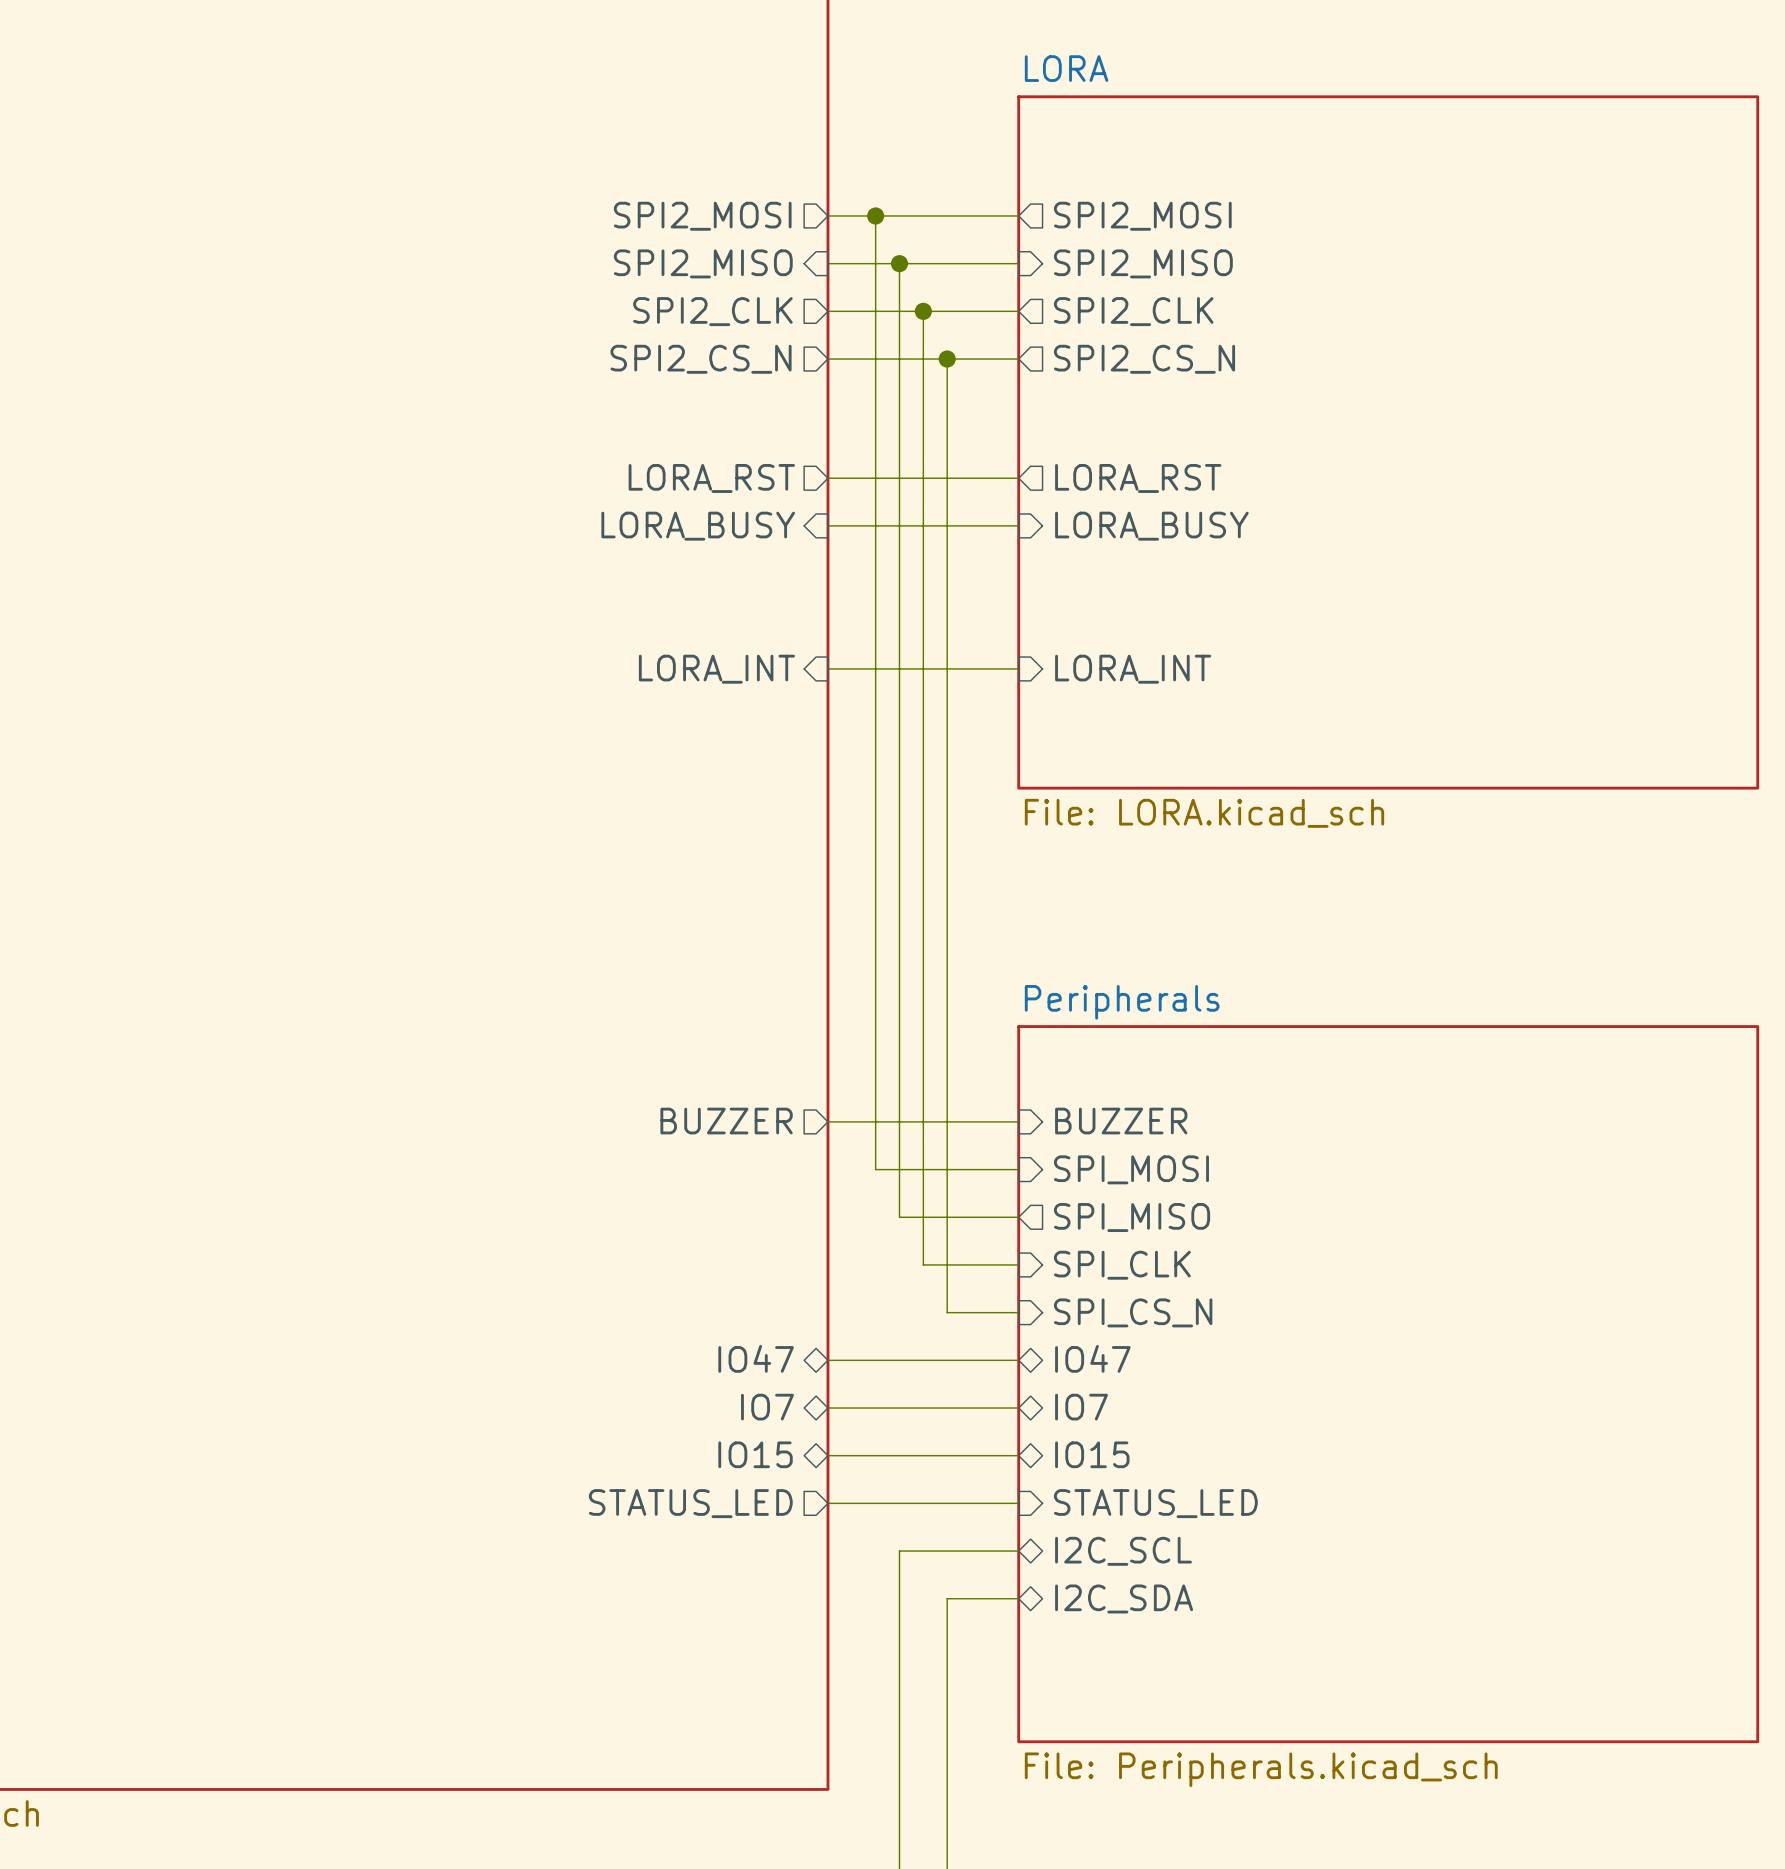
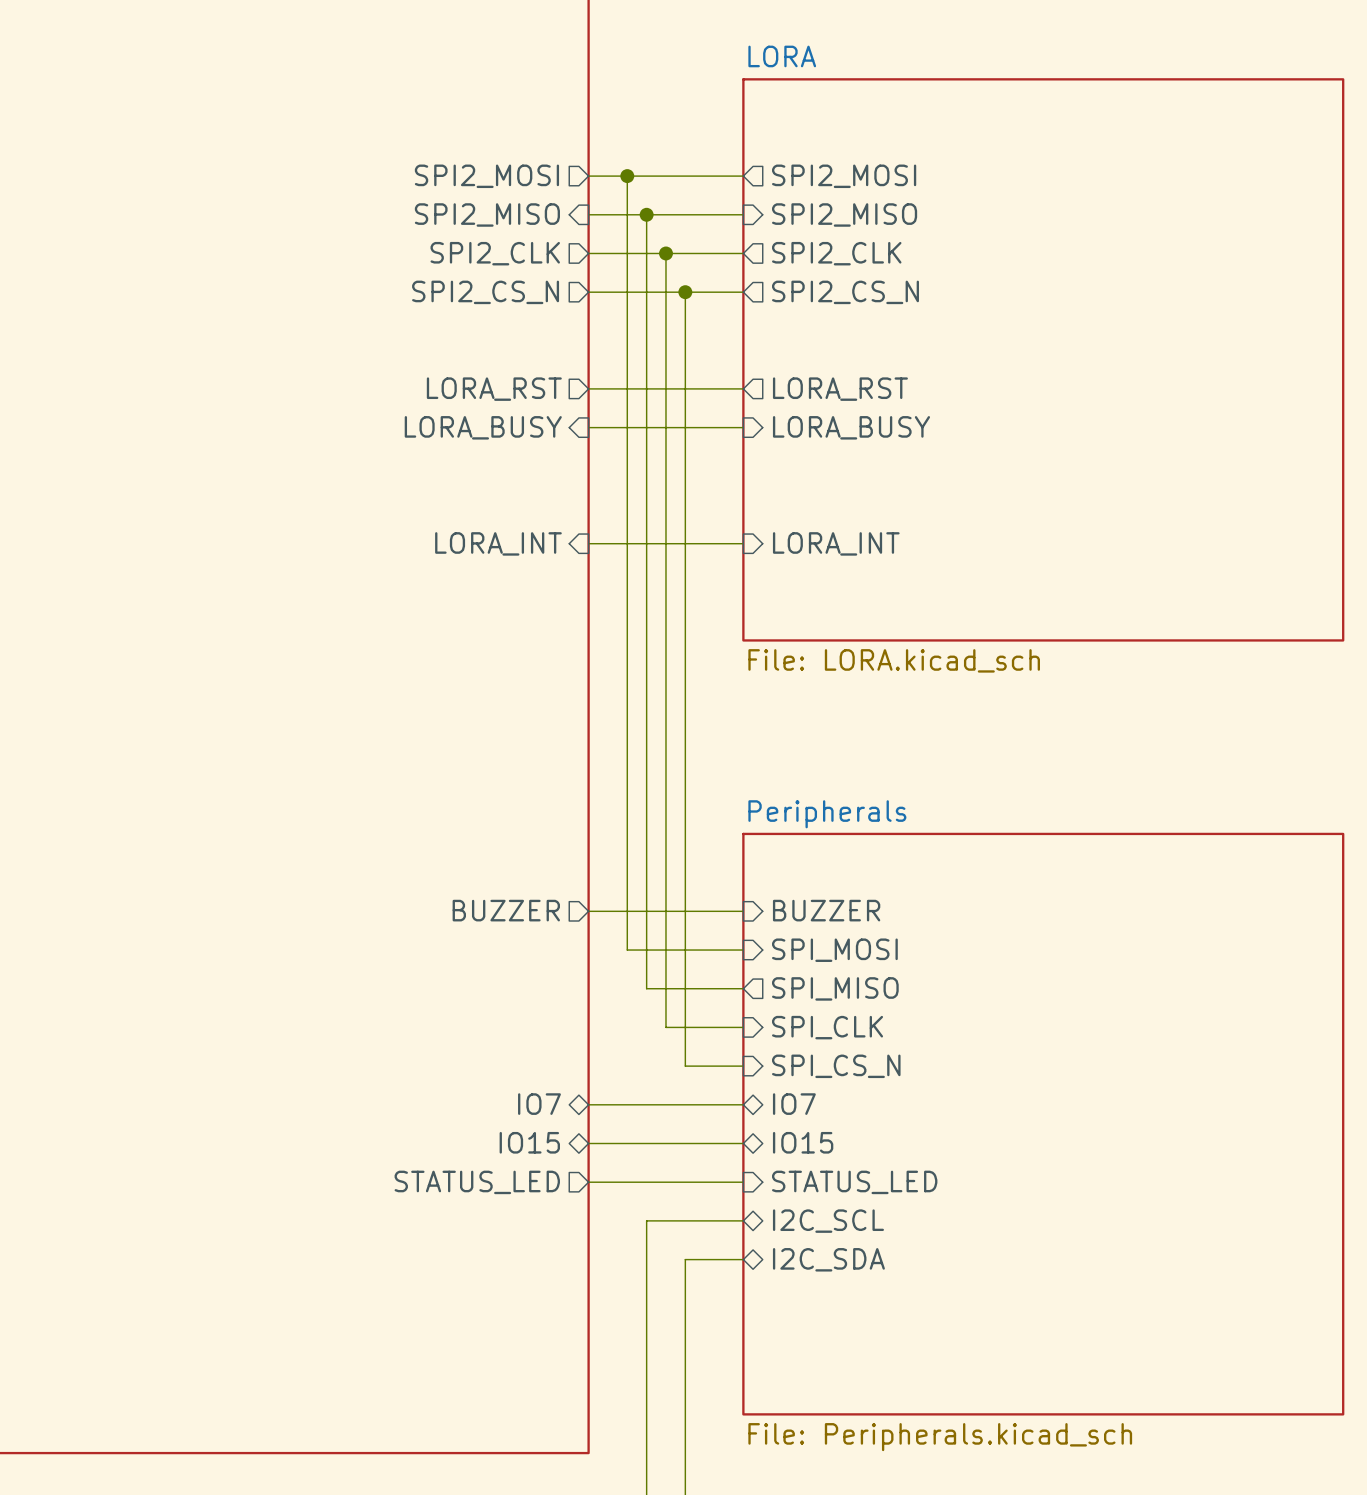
sheet pin: IO47 (756, 1358) -> IO7 (539, 1104)
sheet pin: IO47 (1092, 1358) -> IO7 (794, 1104)
sheet pin: IO7 (767, 1407) -> IO15 (529, 1142)
sheet pin: IO7 (1081, 1407) -> IO15 (803, 1142)
sheet pin shape: bidirectional (755, 1454) -> output (477, 1182)
sheet pin: IO15 (755, 1454) -> STATUS_LED (477, 1182)
sheet pin shape: bidirectional (1092, 1454) -> input (854, 1182)
sheet pin: IO15 (1092, 1454) -> STATUS_LED (854, 1182)
sheet pin: STATUS_LED (690, 1503) -> none
wire: (827, 1503) (899, 1503) -> none
sheet pin shape: input (1155, 1503) -> bidirectional (828, 1221)
sheet pin: STATUS_LED (1155, 1503) -> I2C_SCL (828, 1221)
wire: (899, 1551) (947, 1551) -> (646, 1259) (646, 1220)
sheet pin: I2C_SCL (1123, 1551) -> I2C_SDA (828, 1259)
wire: (947, 1598) (1018, 1598) -> (685, 1298) (685, 1259)
sheet pin: I2C_SDA (1124, 1598) -> none

